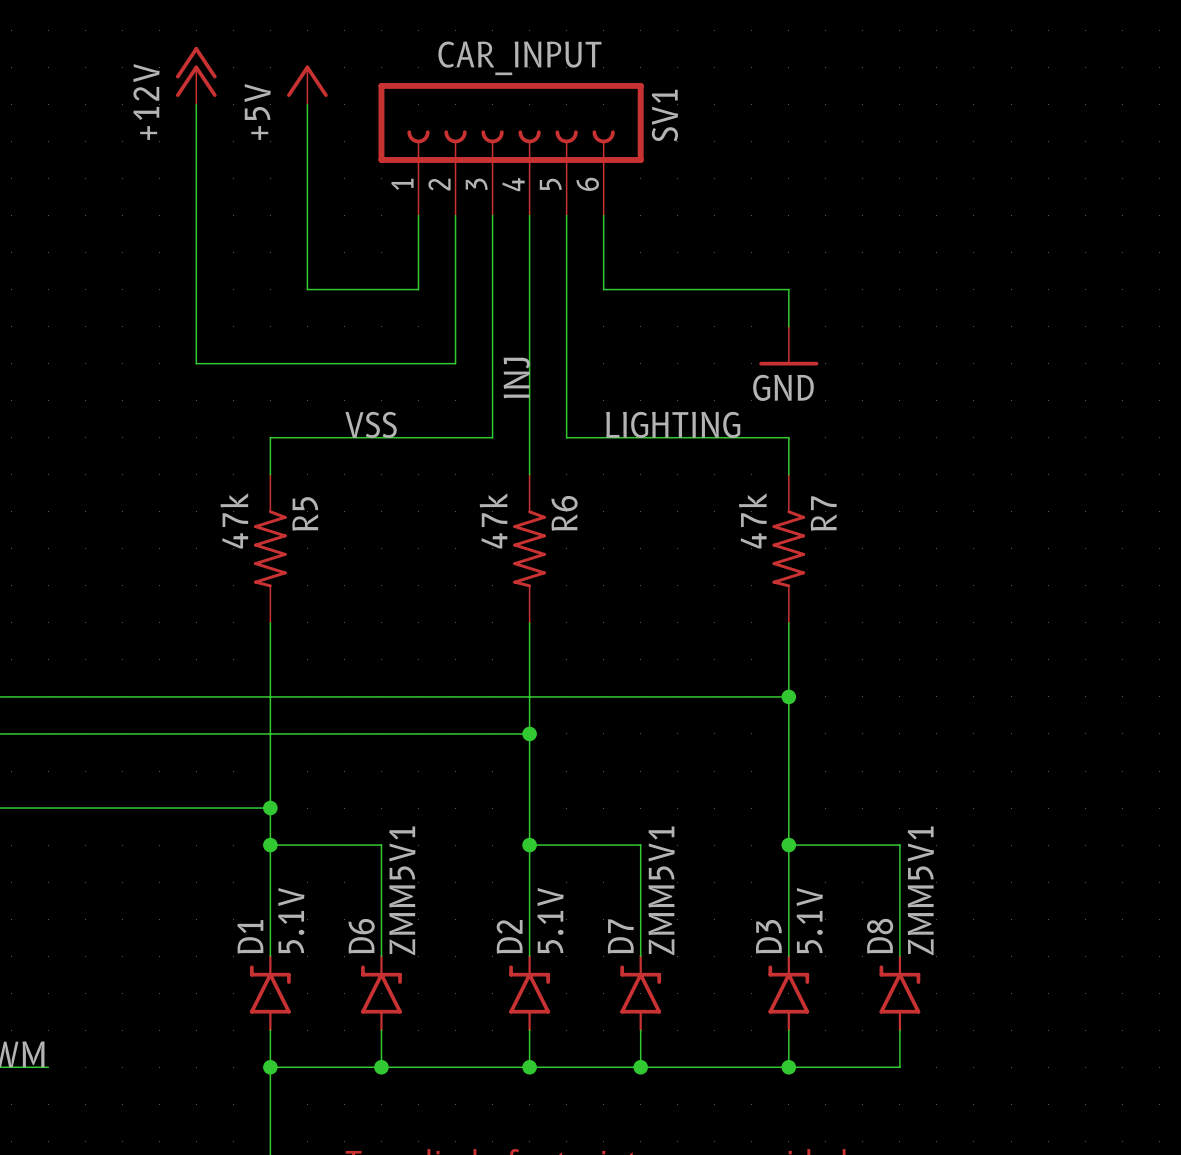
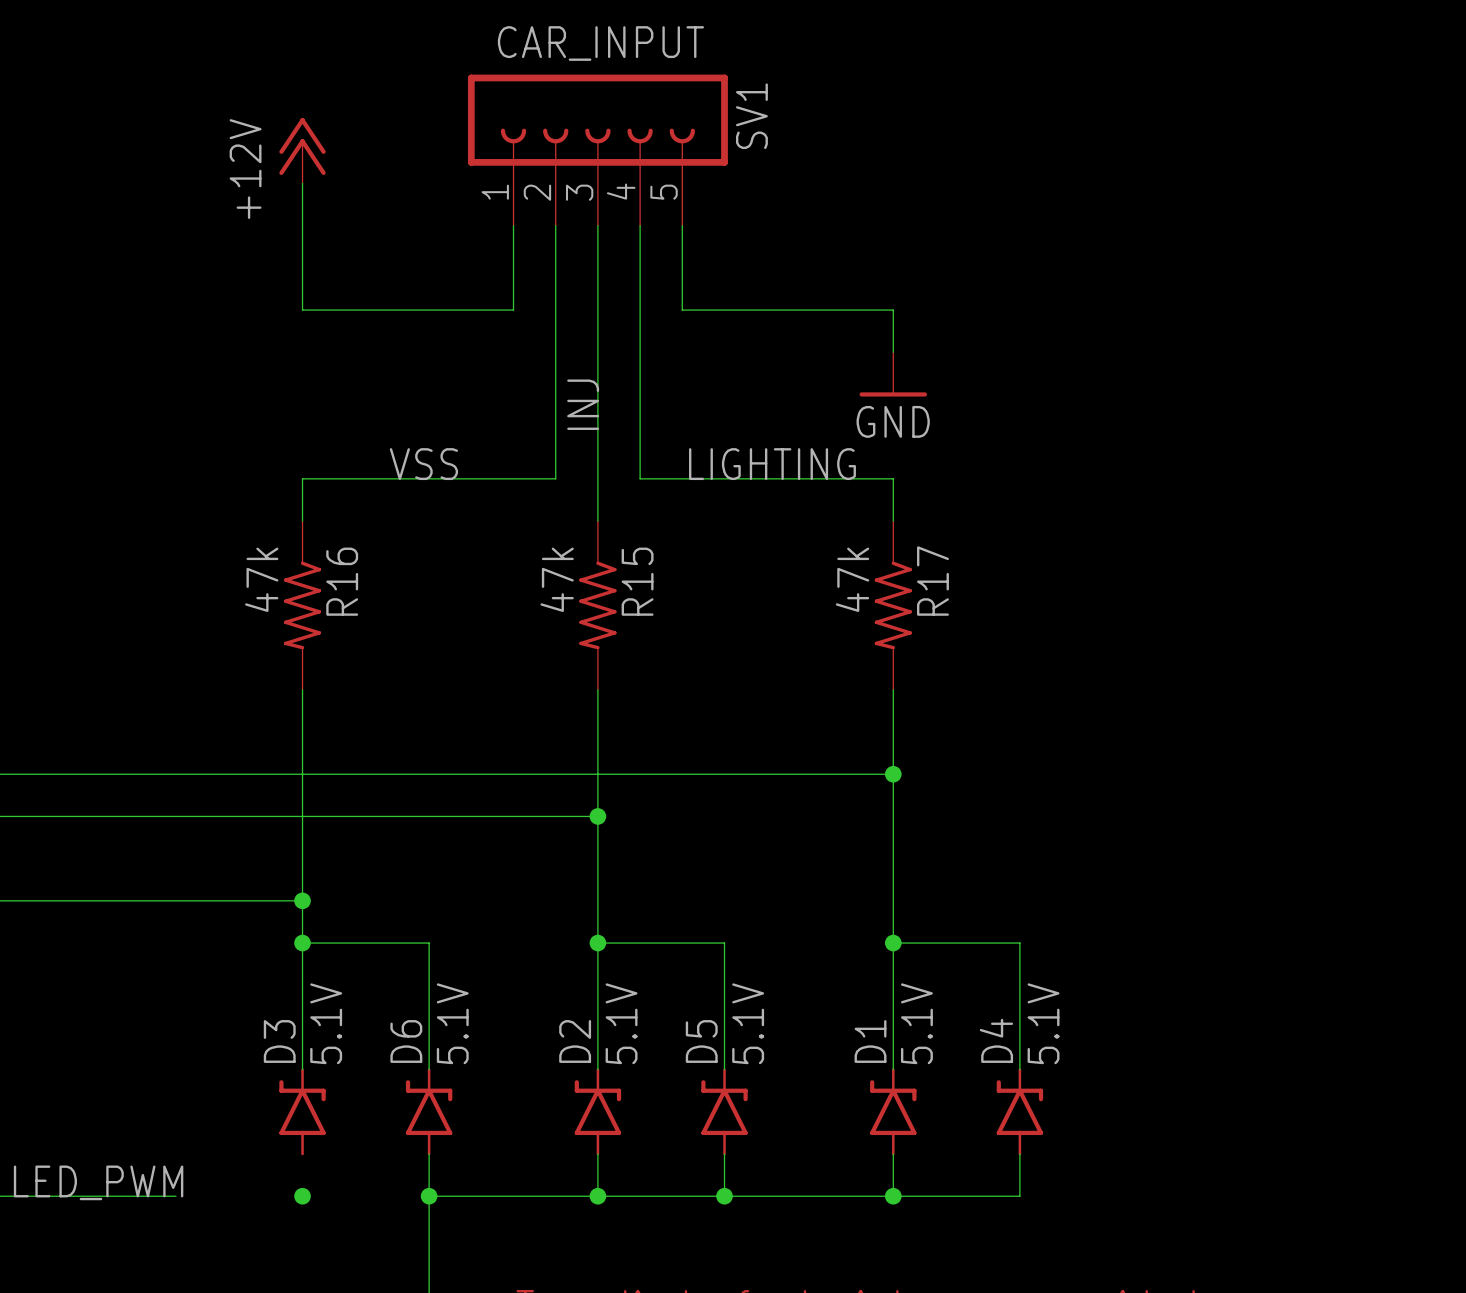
power symbol position: +12V (196, 75) -> +12V (302, 150)
SV1 symbol: [378, 82, 644, 216] -> [467, 74, 728, 226]
power symbol: +5V (307, 84) -> none
wire: (196, 104) (196, 363) (455, 363) -> none
wire: (307, 104) (307, 289) -> (302, 183) (302, 310) (471, 310)
wire: (529, 215) (529, 474) -> none
wire: (566, 215) (566, 437) -> (555, 225) (555, 478)
wire: (603, 215) (603, 289) -> (682, 310) (808, 310)
wire: (344, 289) (418, 289) -> (513, 310) (513, 225)
wire: none -> (597, 310) (597, 521)
wire: (492, 289) (492, 437) -> (766, 478) (682, 478)
wire: (677, 289) (788, 289) (788, 326) -> (893, 310) (893, 352)
power symbol position: GND (788, 346) -> GND (893, 374)
label position: INJ (516, 377) -> INJ (583, 404)
label position: VSS (371, 424) -> VSS (423, 464)
label position: LIGHTING (673, 424) -> LIGHTING (772, 464)
wire: (270, 437) (270, 474) -> (429, 478) (302, 478) (302, 521)
wire: (381, 437) (455, 437) -> (640, 394) (640, 478)
wire: (677, 437) (788, 437) (788, 474) -> (893, 478) (893, 521)
R16: none -> 47k (302, 605)
R5: 47k (270, 548) -> none
R15: none -> 47k (597, 605)
R6: 47k (529, 548) -> none
R17: none -> 47k (893, 605)
R7: 47k (788, 548) -> none
wire: none -> (302, 689) (302, 1069)
wire: (270, 622) (270, 845) (381, 845) (381, 956) -> none
wire: none -> (597, 689) (597, 1069)
wire: (529, 622) (529, 845) (640, 845) (640, 956) -> none
wire: none -> (893, 689) (893, 1069)
wire: (788, 622) (788, 845) (899, 845) (899, 956) -> none
wire: (677, 696) (788, 696) -> (893, 943) (1019, 943)
junction: none -> (893, 774)
junction: (788, 696) -> none
wire: (418, 733) (529, 733) -> (597, 943) (724, 943)
junction: none -> (597, 816)
junction: (529, 733) -> none
wire: (159, 808) (270, 808) -> (302, 943) (429, 943)
junction: none -> (302, 900)
junction: (270, 808) -> none
junction: none -> (302, 943)
junction: (270, 845) -> none
junction: none -> (597, 943)
junction: (529, 845) -> none
junction: none -> (893, 943)
junction: (788, 845) -> none
D1 name: D1 (250, 936) -> D6 (406, 1041)
D2 name: D2 (509, 936) -> D5 (701, 1041)
D3 name: D3 (768, 936) -> D4 (996, 1040)
D3: none -> 5.1V (302, 1111)
D6: ZMM5V1 (381, 993) -> none
D2: none -> 5.1V (597, 1111)
D7: ZMM5V1 (640, 993) -> none
D1: none -> 5.1V (893, 1111)
D8: ZMM5V1 (899, 993) -> none
wire: (381, 1030) (381, 1067) -> (597, 1154) (597, 1196)
wire: (640, 1030) (640, 1067) -> (893, 1154) (893, 1196)
wire: (899, 1030) (899, 1067) (788, 1067) -> none
junction: none -> (302, 1196)
junction position: (381, 1067) -> (597, 1196)
junction position: (640, 1067) -> (893, 1196)
junction: (788, 1067) -> none

